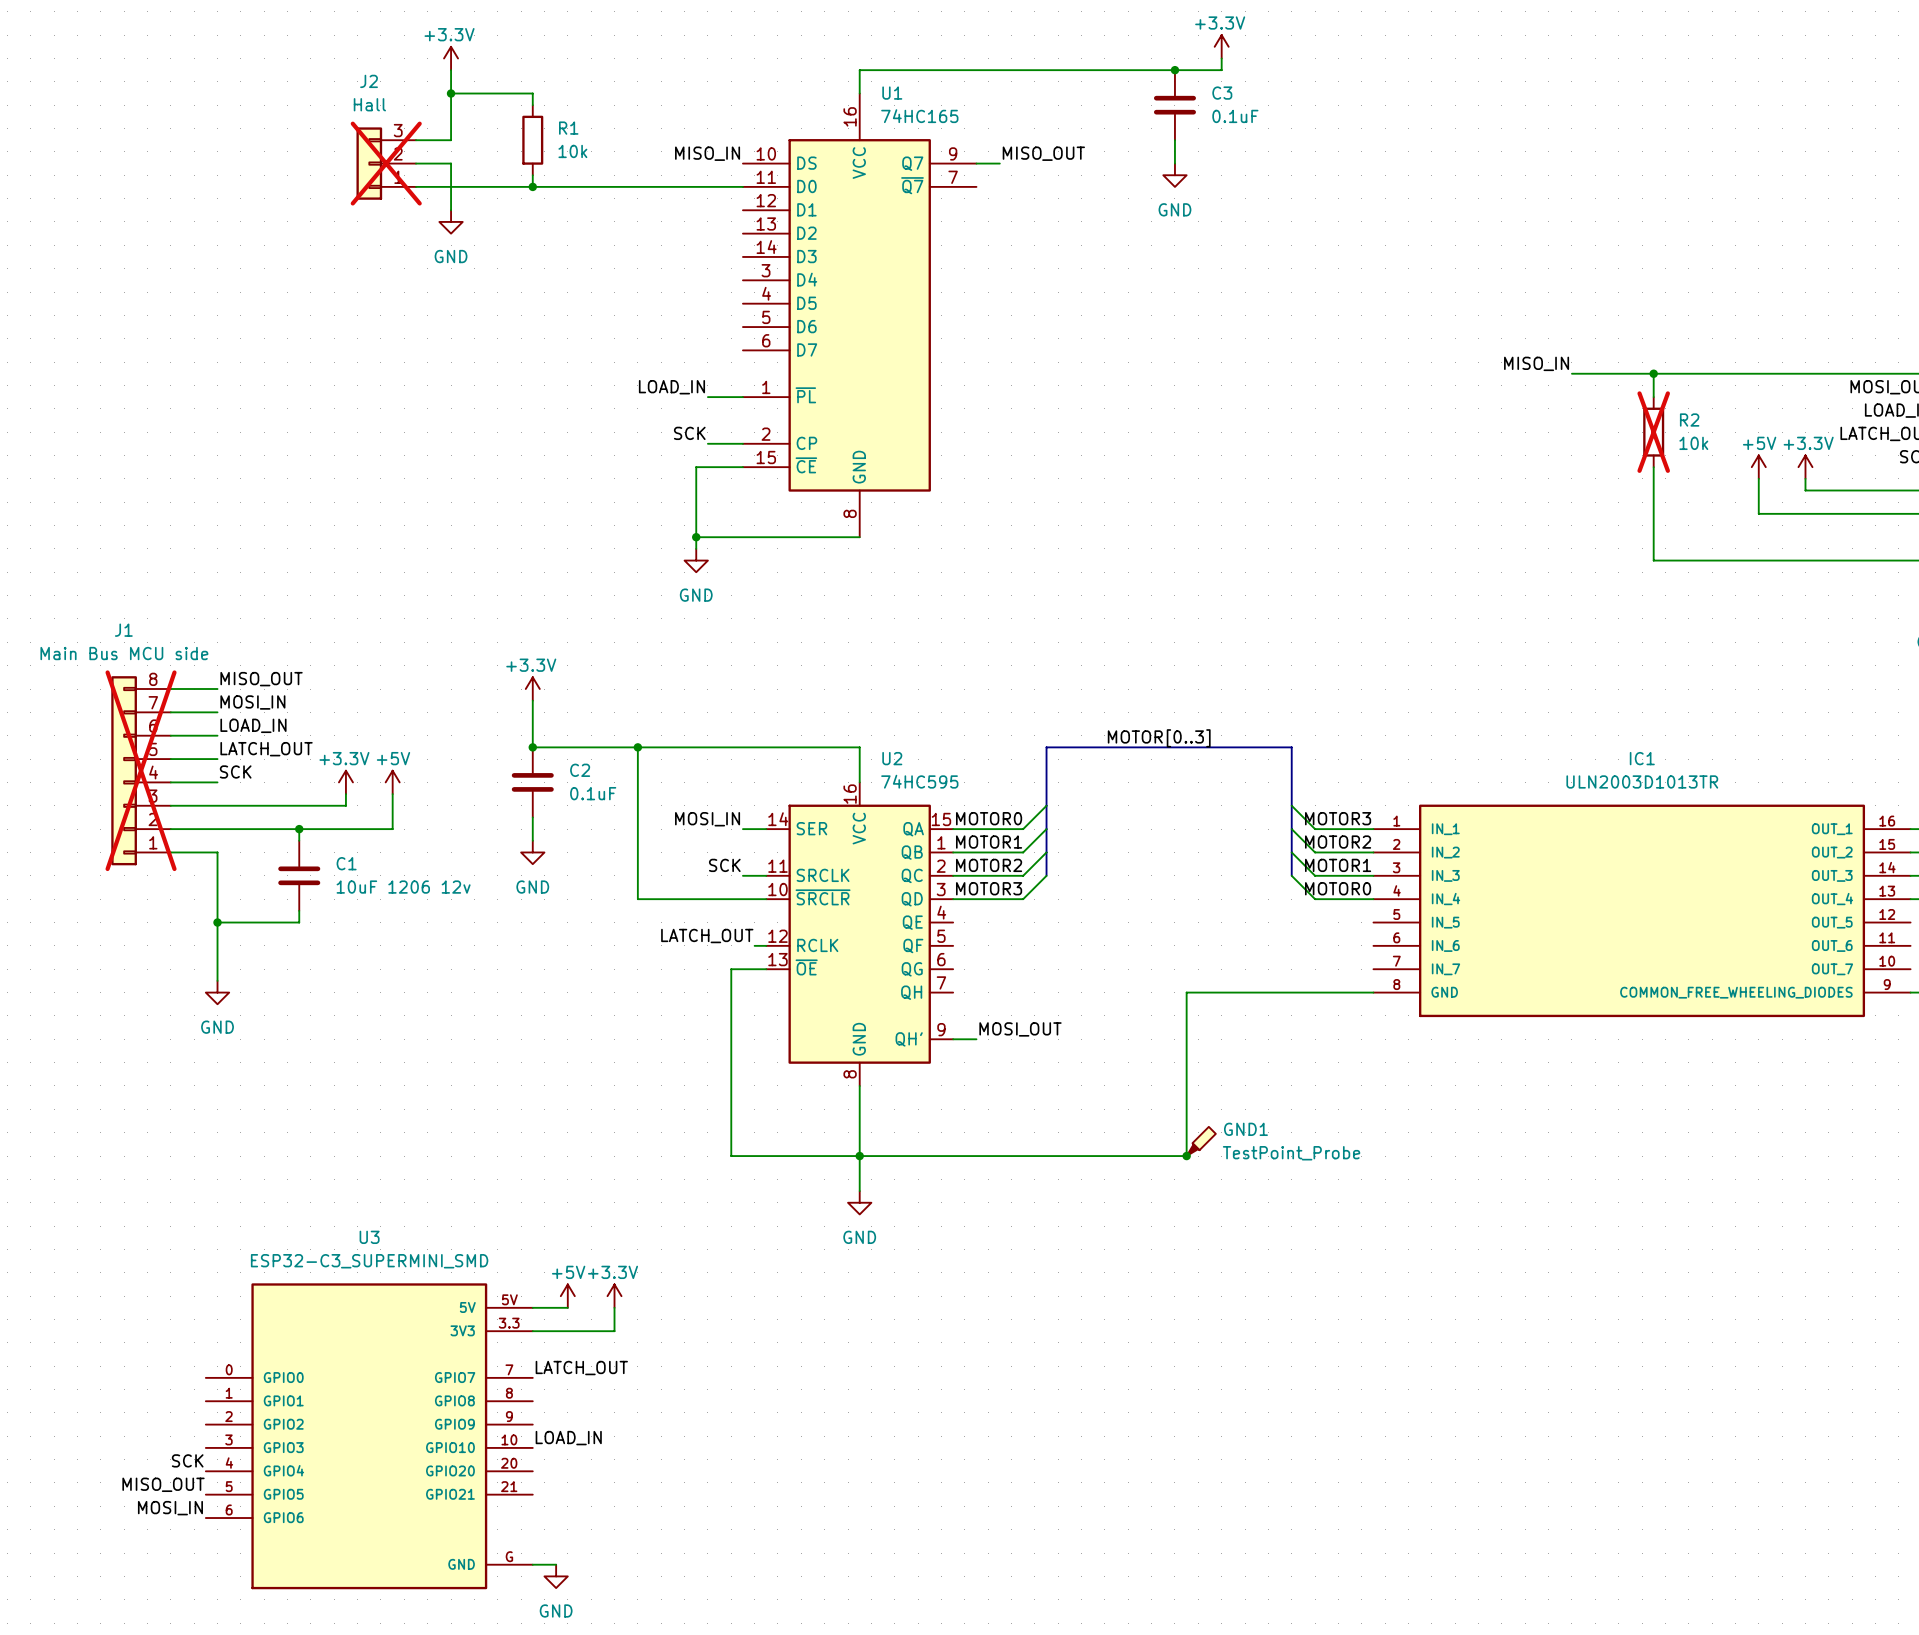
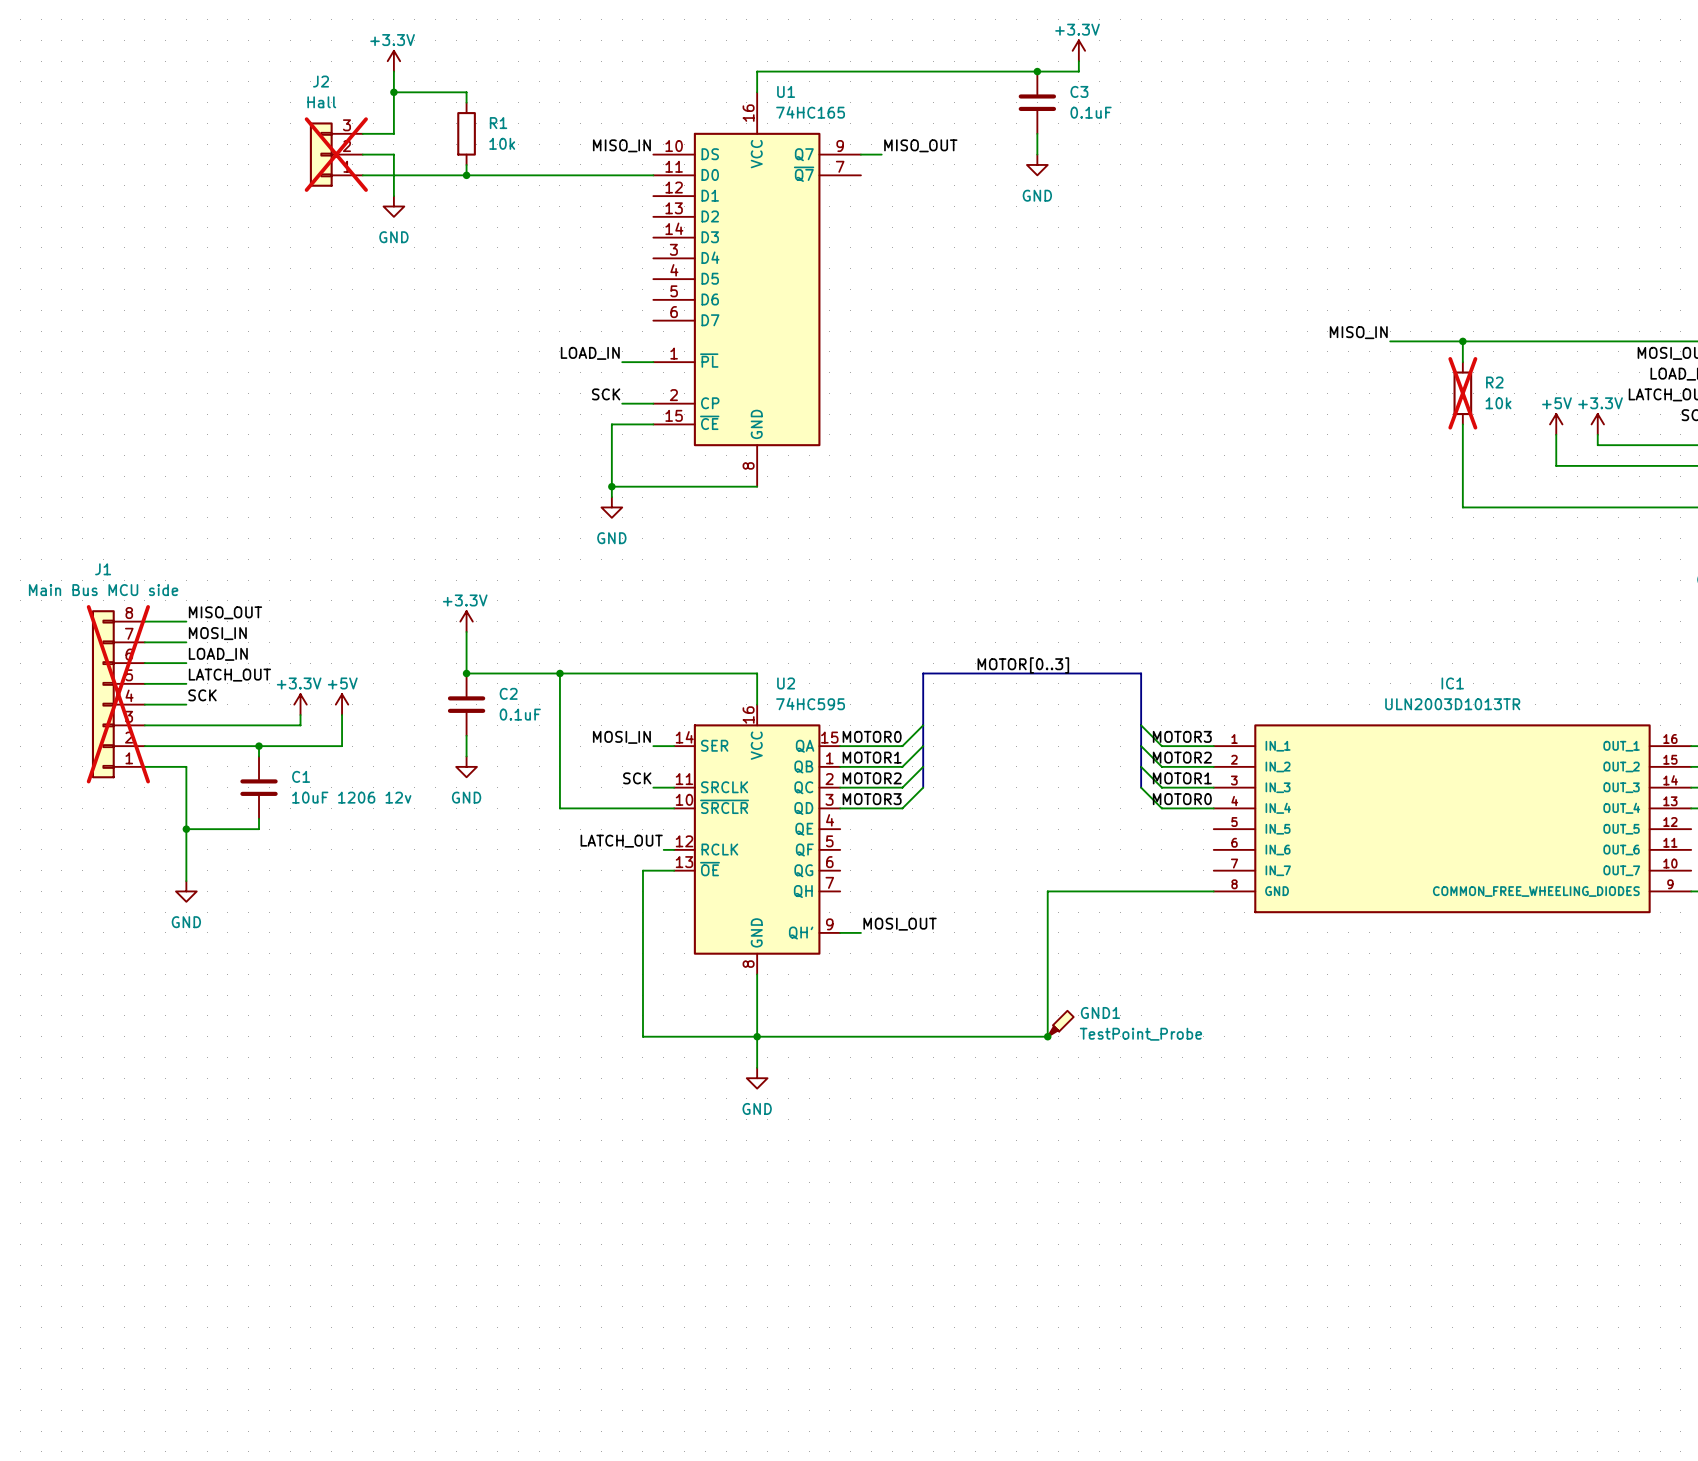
power symbol: +5V (567, 1296) -> none
power symbol: +3.3V (614, 1296) -> none
wire: (532, 1307) (567, 1307) -> none
wire: (614, 1307) (614, 1331) (532, 1331) -> none
label: LATCH_OUT (581, 1368) -> none
U3: ESP32-C3_SUPERMINI_SMD (369, 1436) -> none
label: LOAD_IN (568, 1438) -> none
label: SCK (187, 1460) -> none
label: MISO_OUT (163, 1484) -> none
label: MOSI_IN (170, 1508) -> none
wire: (532, 1564) (556, 1564) -> none
power symbol: GND (556, 1576) -> none

